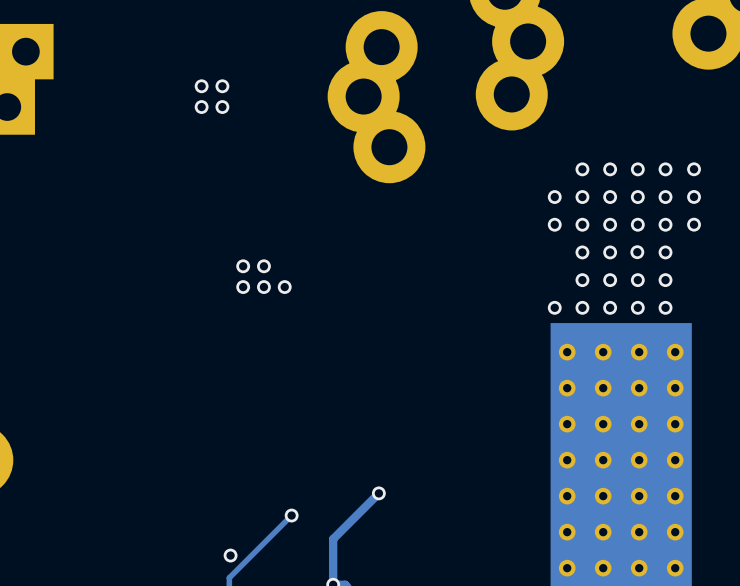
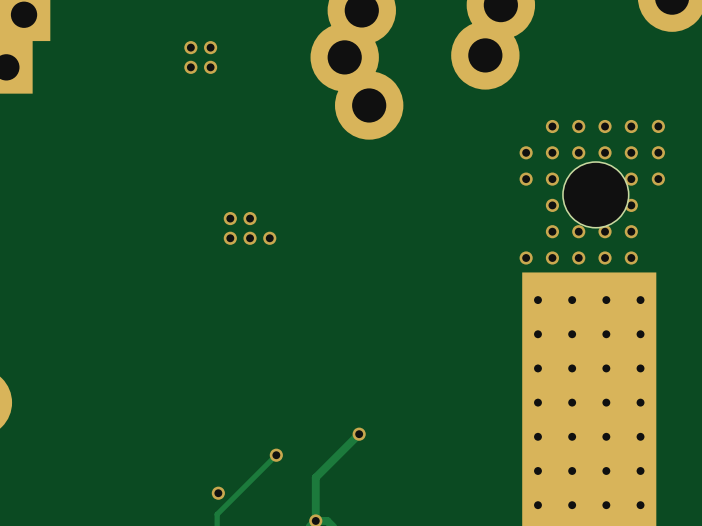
via: (610, 224) -> none
via: (637, 224) -> none
part: none -> (595, 194)
via: (610, 252) -> none
via: (637, 252) -> none

